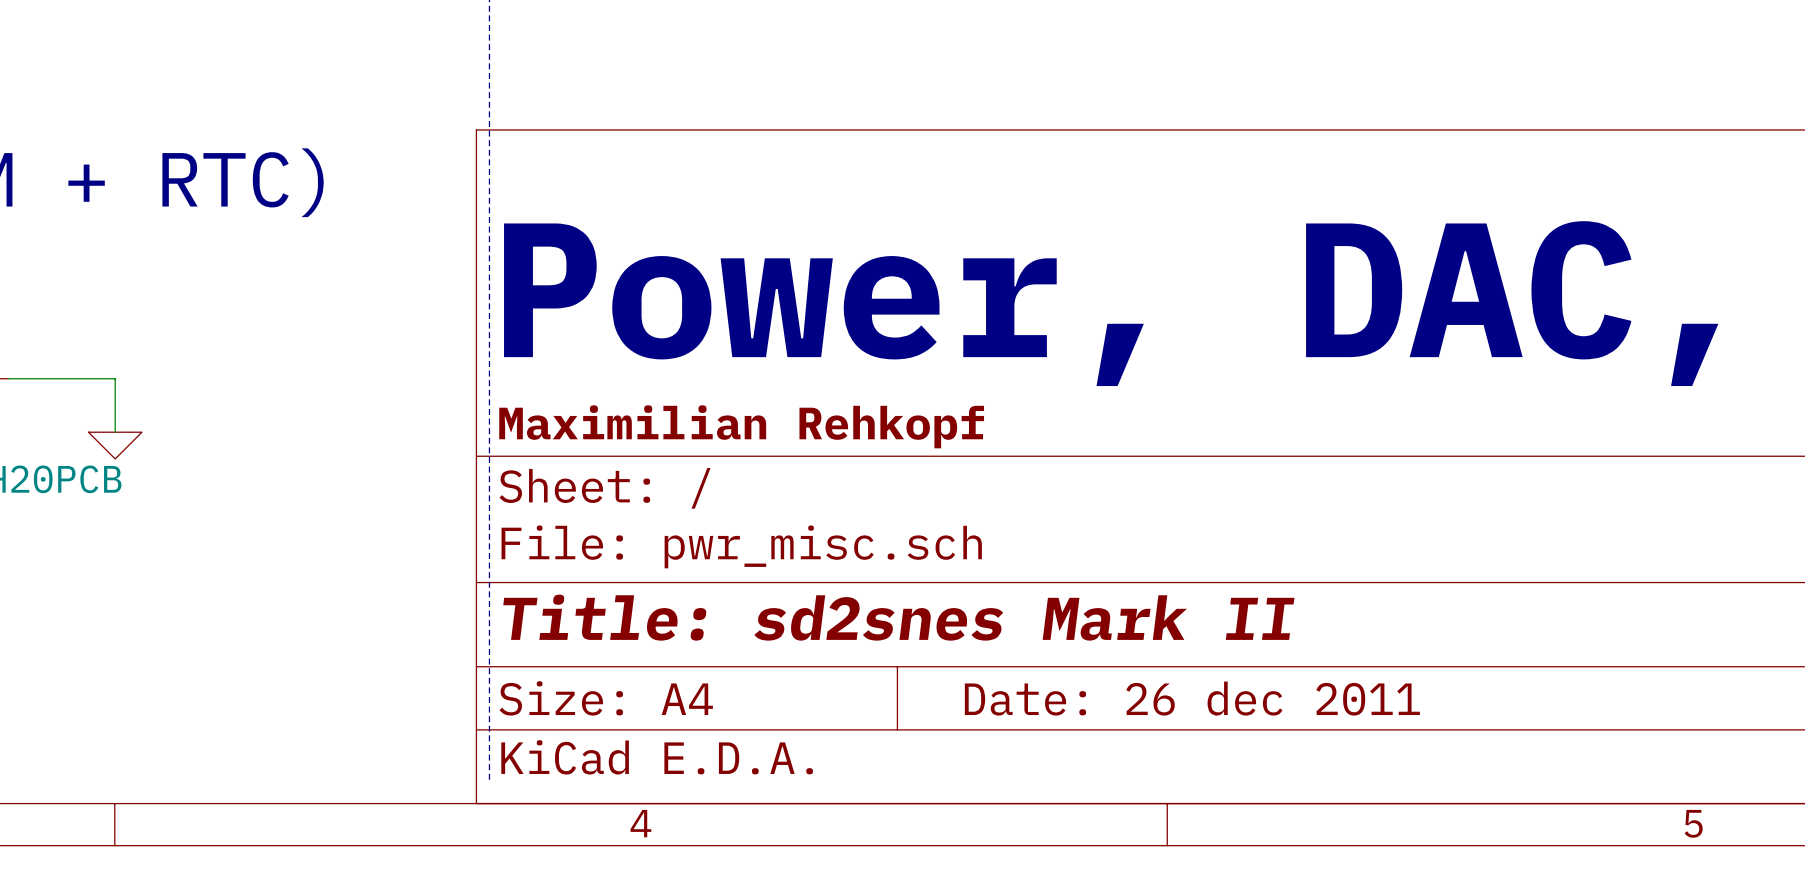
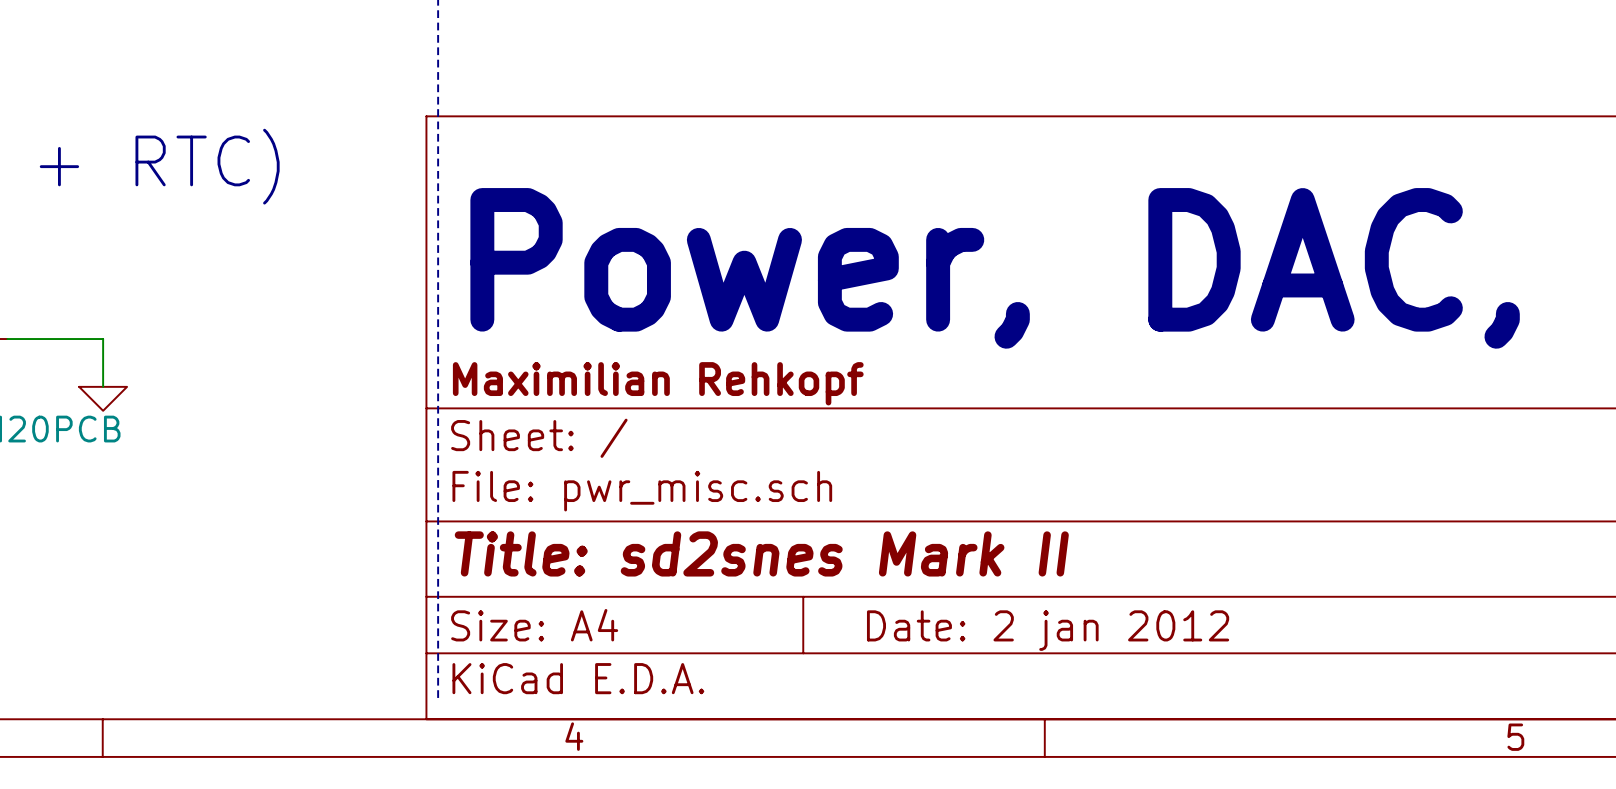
title block: Date: 26 dec 2011 (1192, 698) -> Date: 2 jan 2012 (1048, 630)

